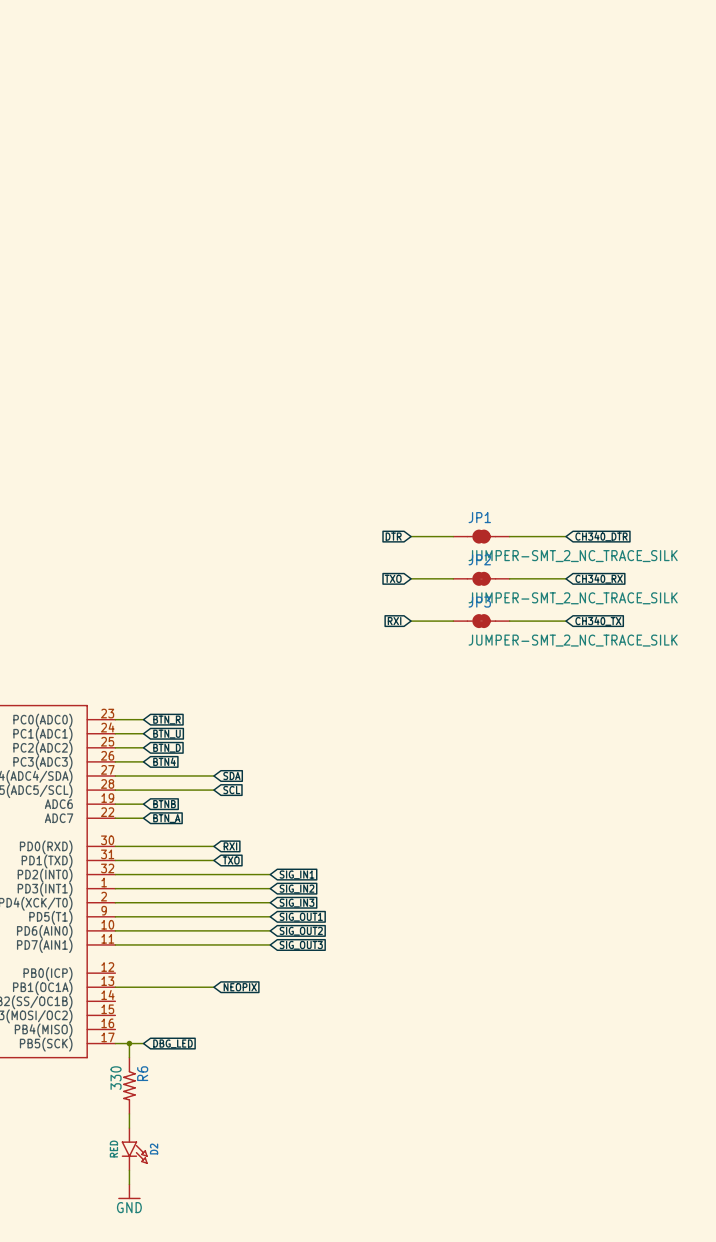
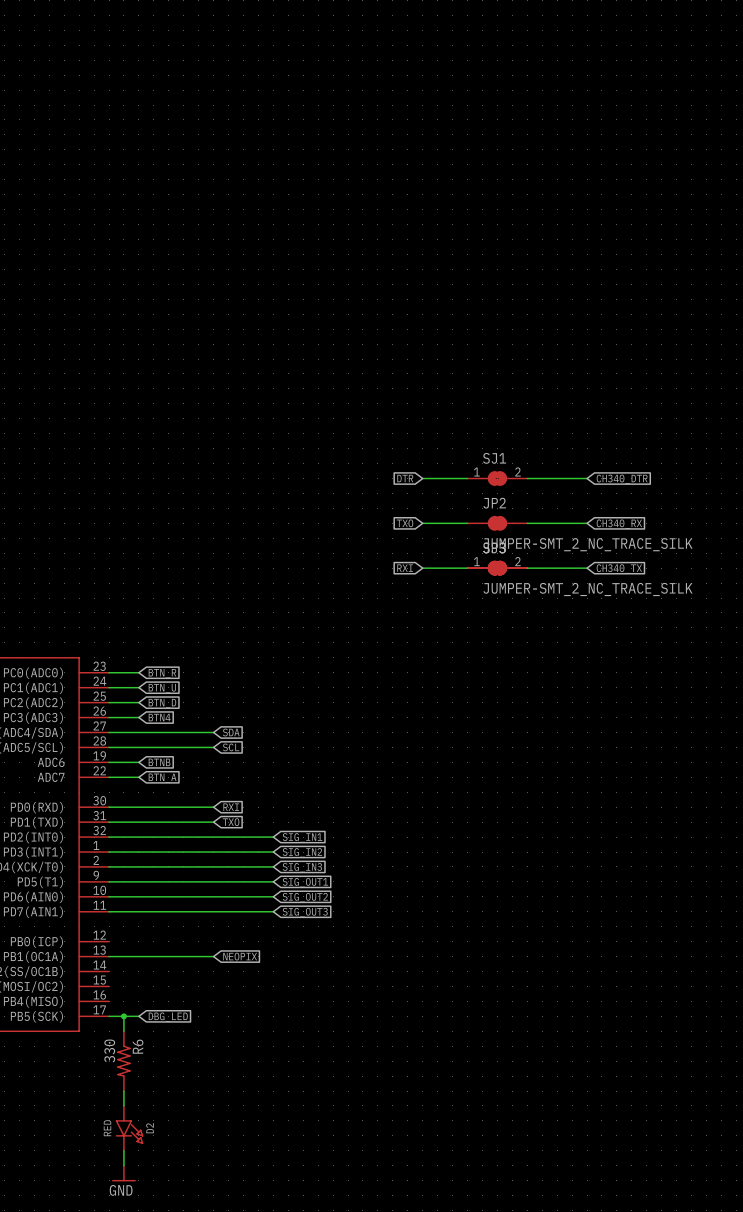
JP1: JUMPER-SMT_2_NC_TRACE_SILK (481, 536) -> none
SJ1: none -> (497, 478)
part: none -> (497, 568)

